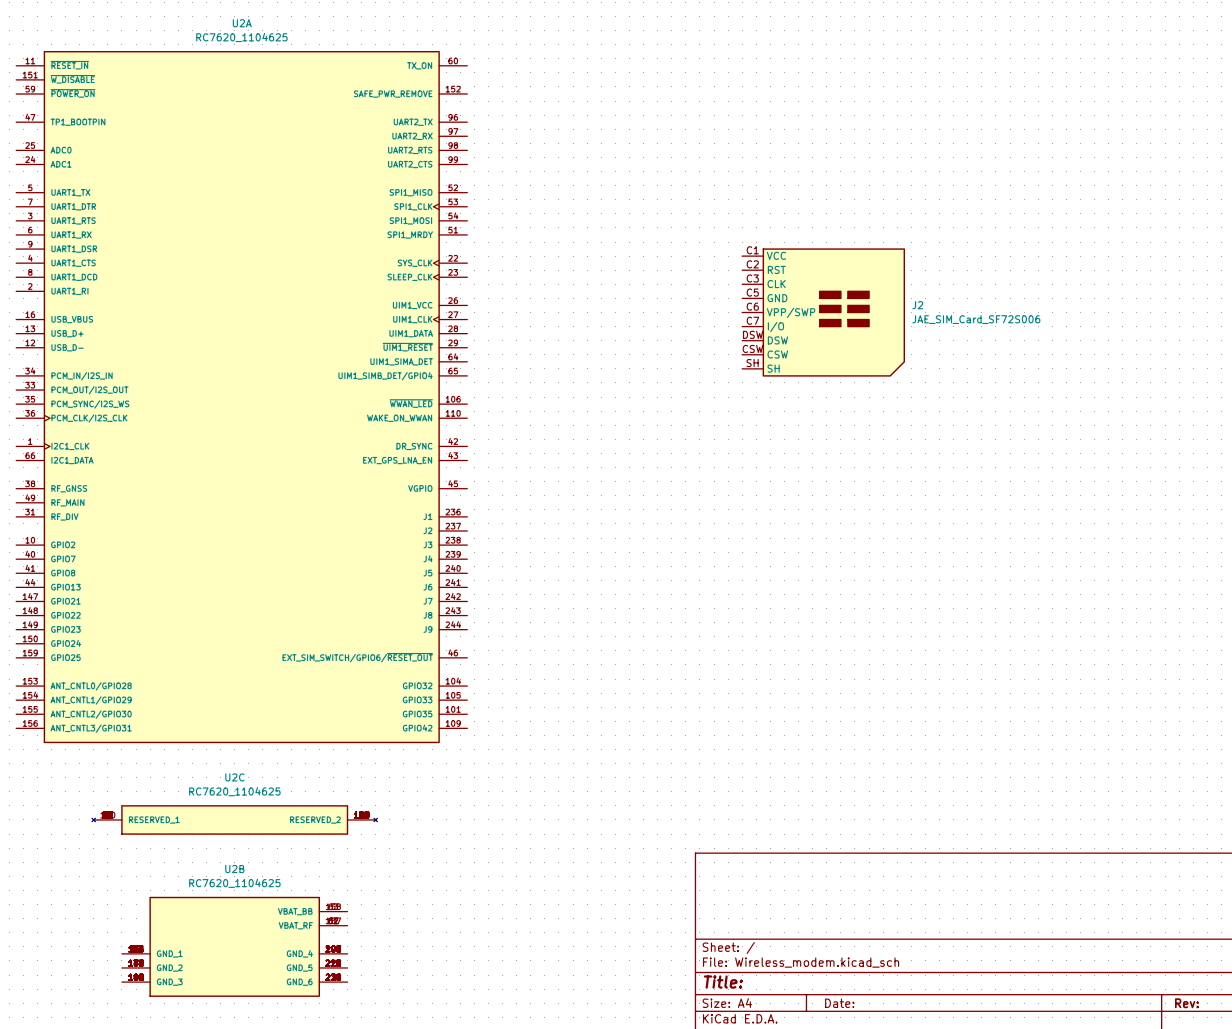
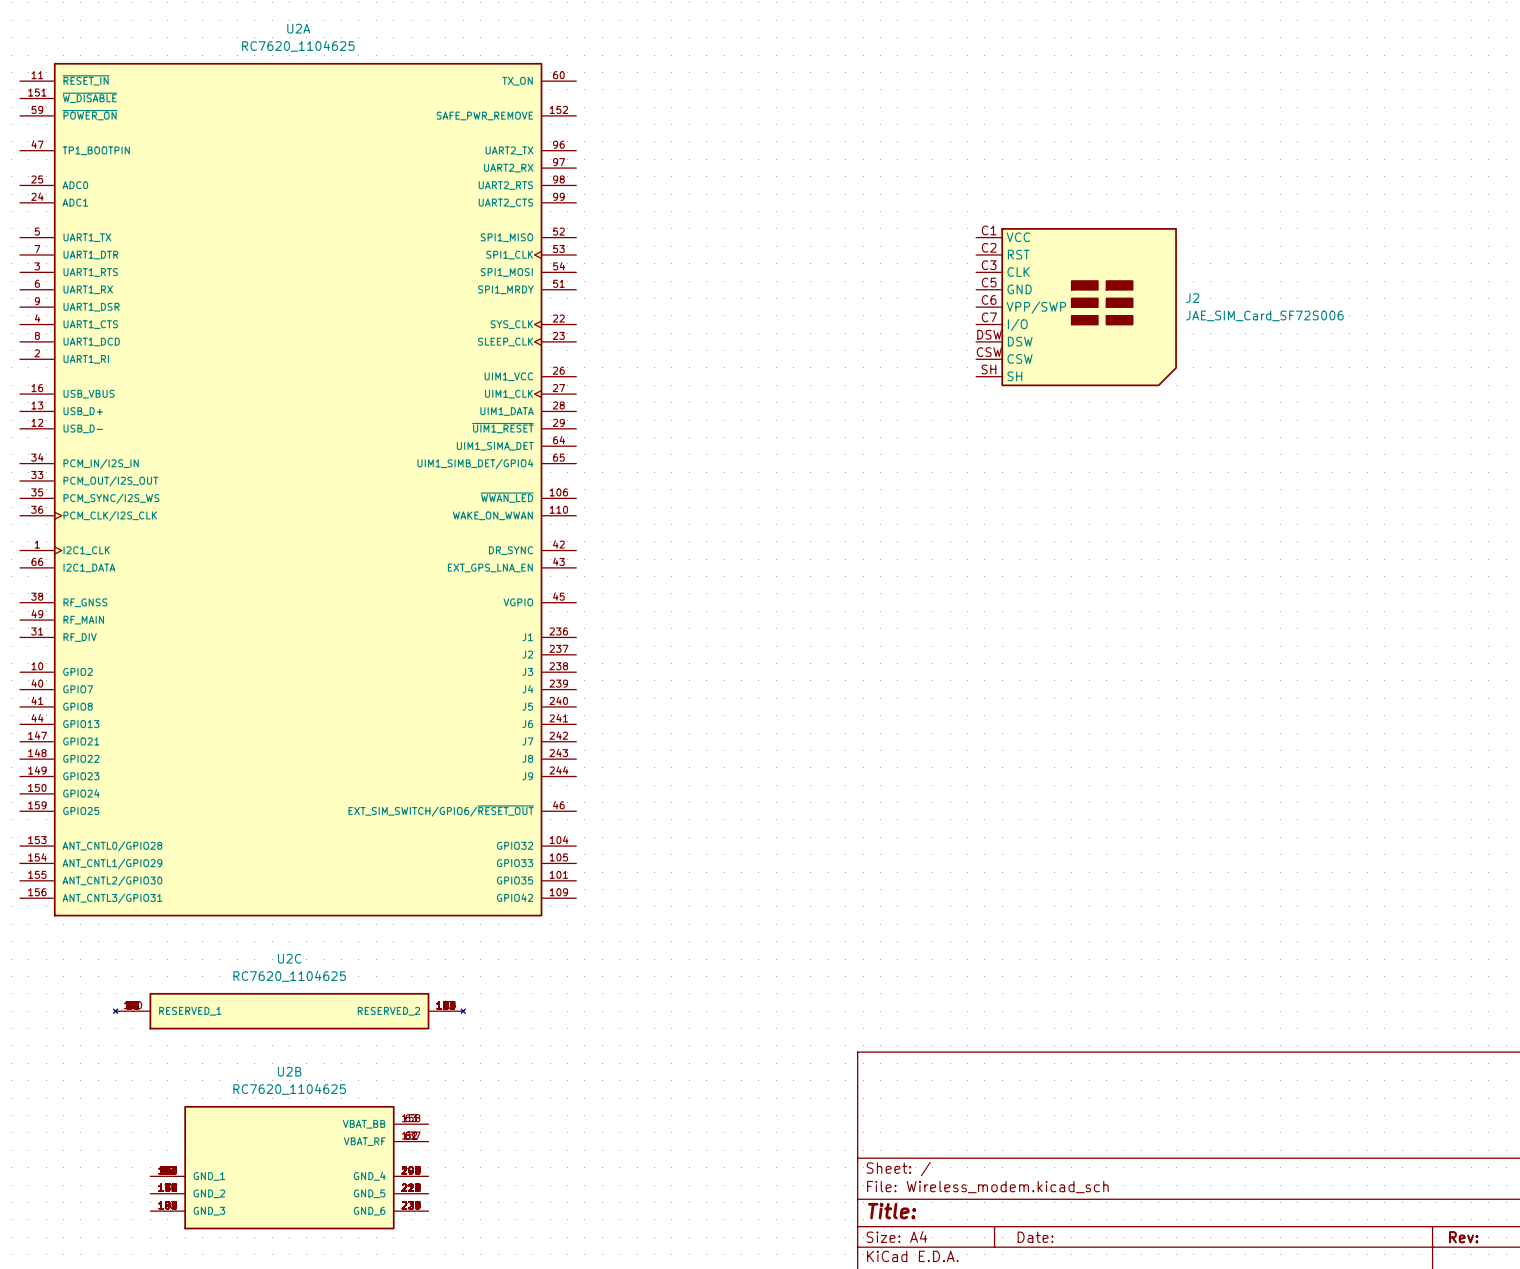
J2 position: (823, 312) -> (1076, 307)

